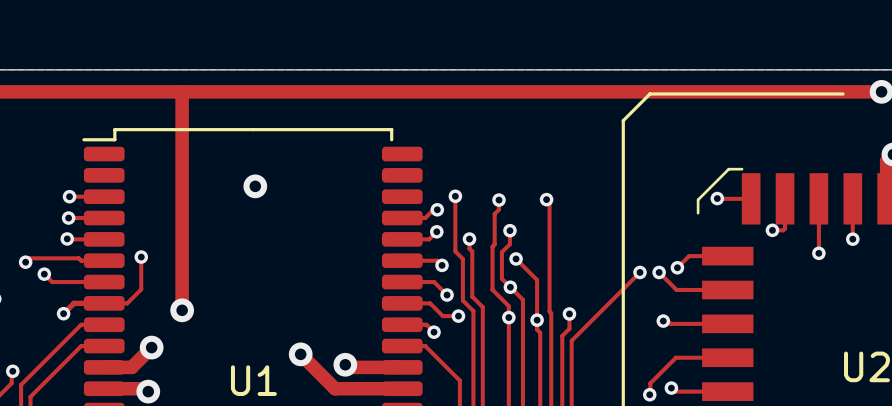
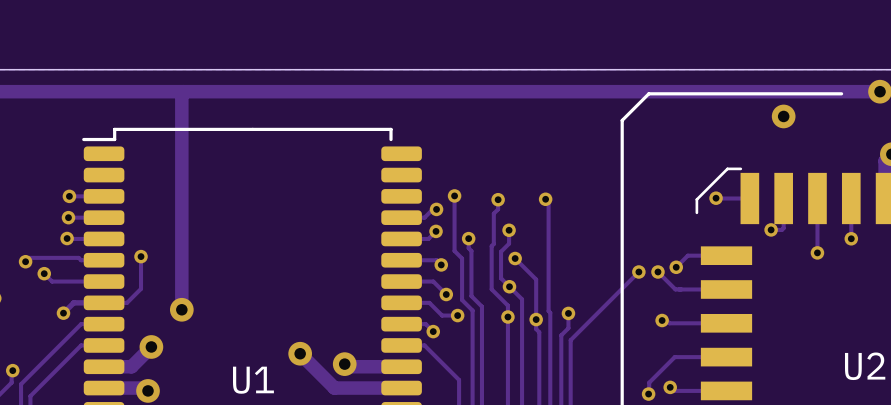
via: none -> (783, 116)
via: (255, 186) -> none

